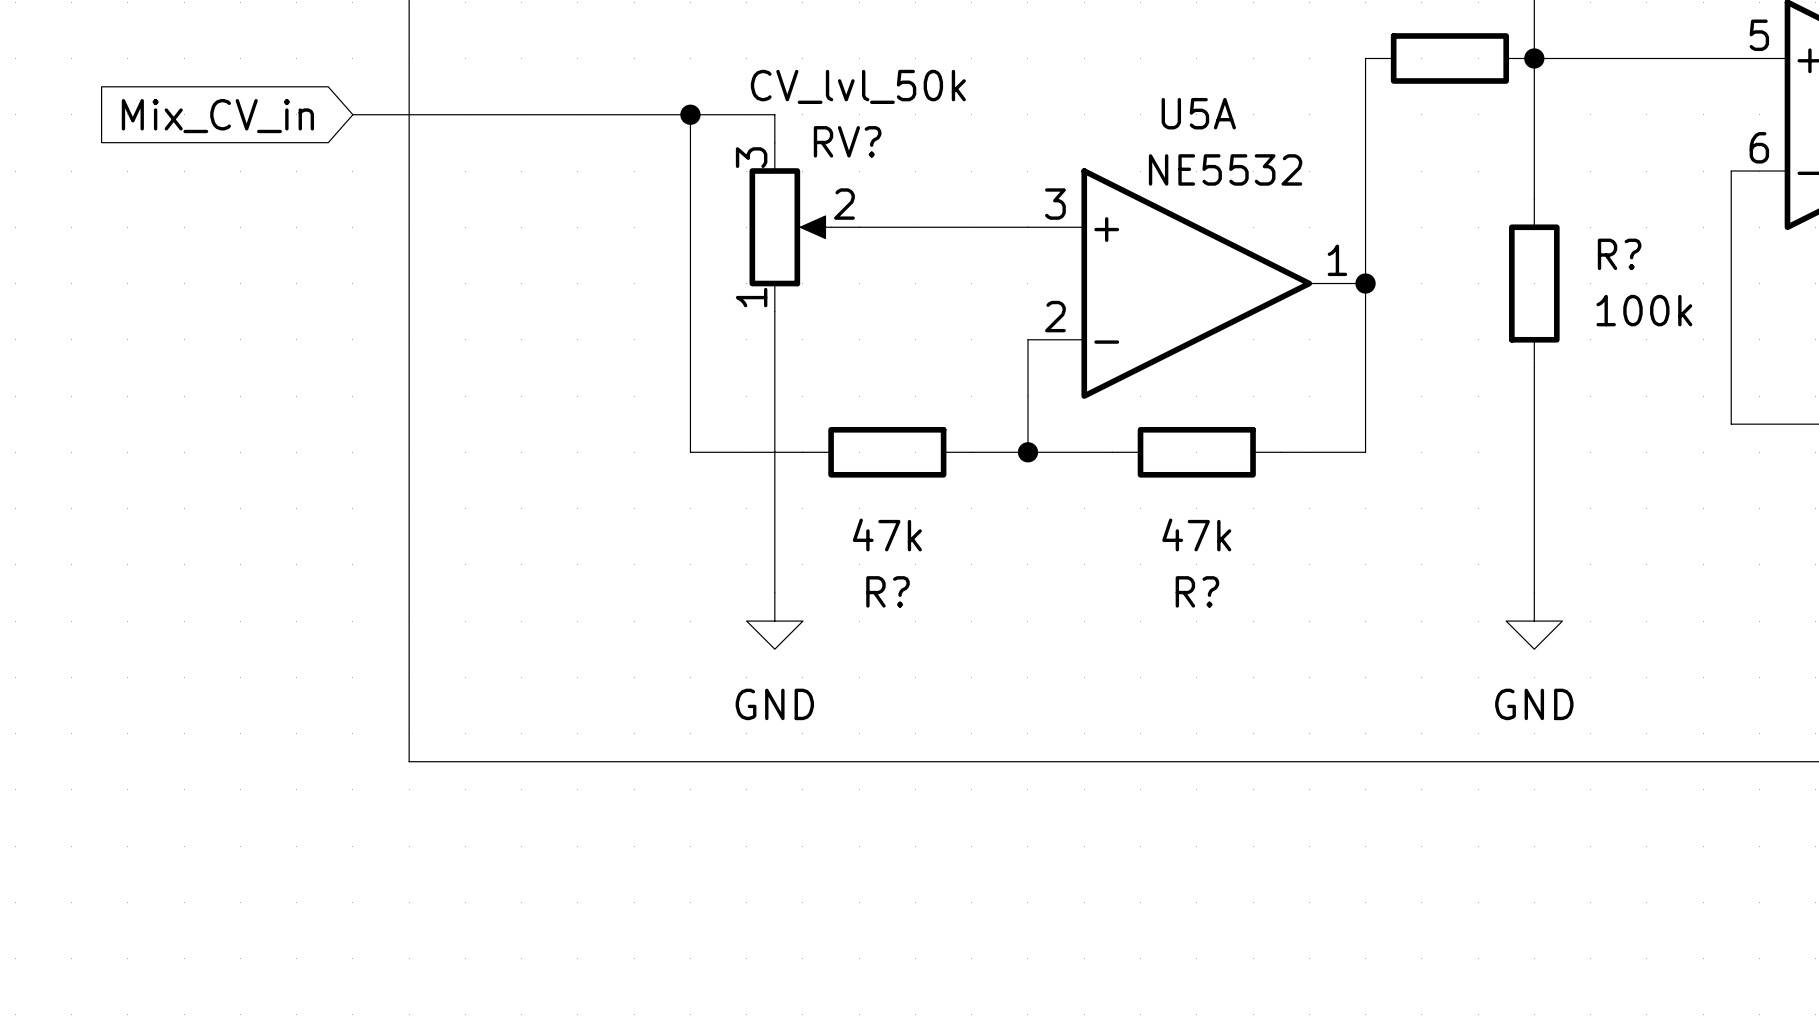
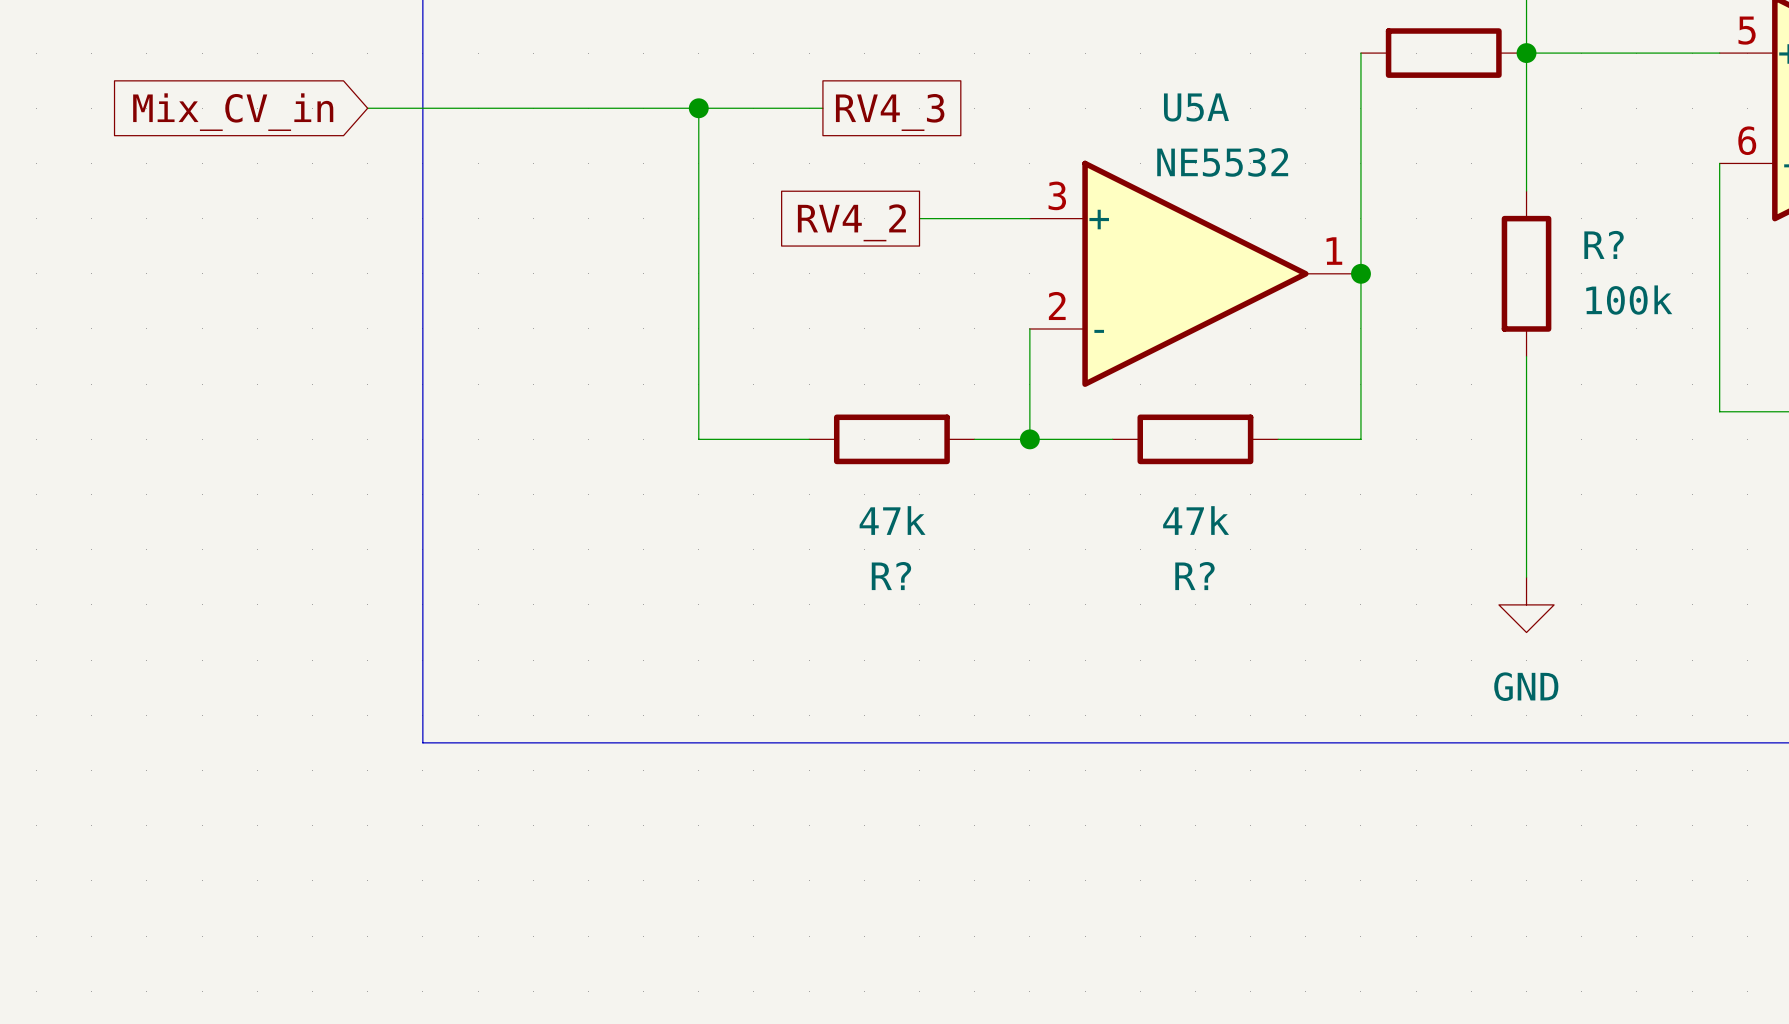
wire: (774, 114) (774, 142) -> (781, 108) (822, 108)
global label: none -> RV4_3 (890, 112)
RV?: CV_lvl_50k (804, 227) -> none
global label: none -> RV4_2 (851, 222)
wire: (859, 227) (915, 227) -> none
wire: (774, 311) (774, 592) -> none
power symbol: GND (774, 621) -> none

